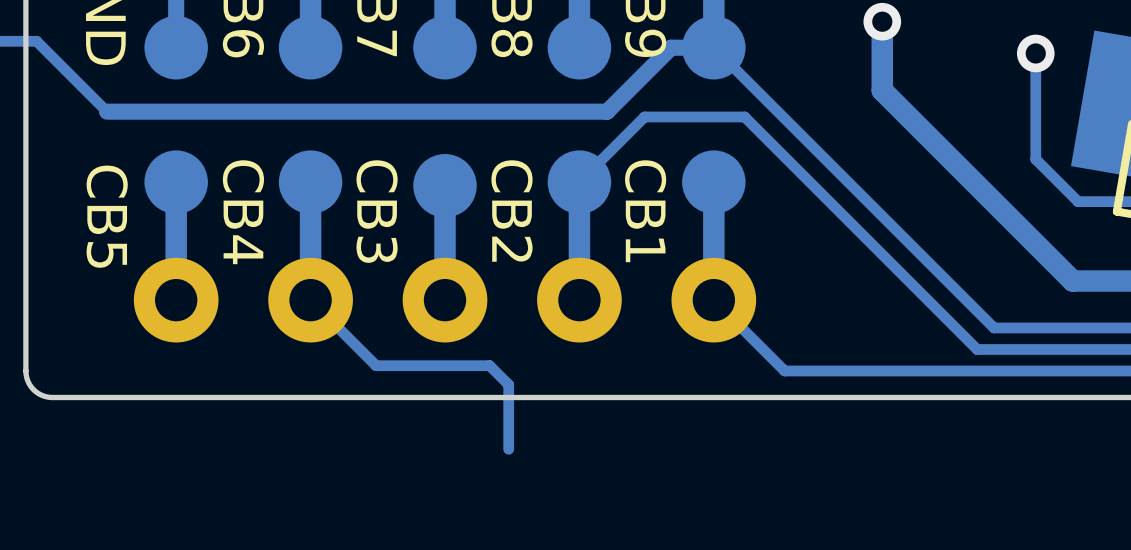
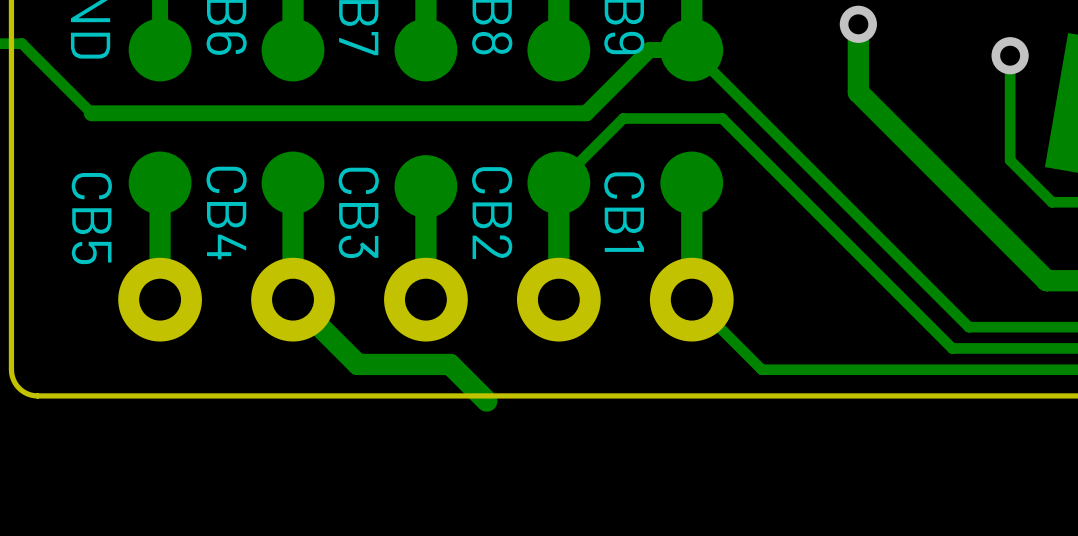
track width: thin (310, 300) (376, 365) (469, 365) -> thick (293, 299) (357, 364) (450, 364)
track: (469, 365) (489, 365) (508, 384) (508, 449) -> (450, 364) (486, 401)

